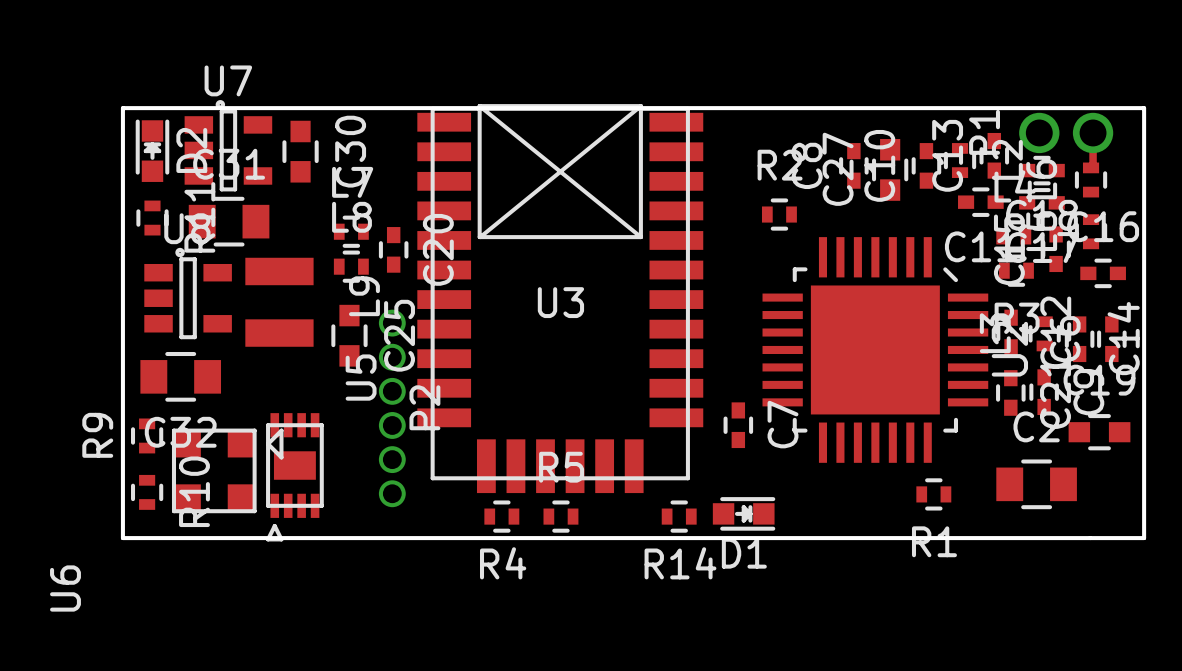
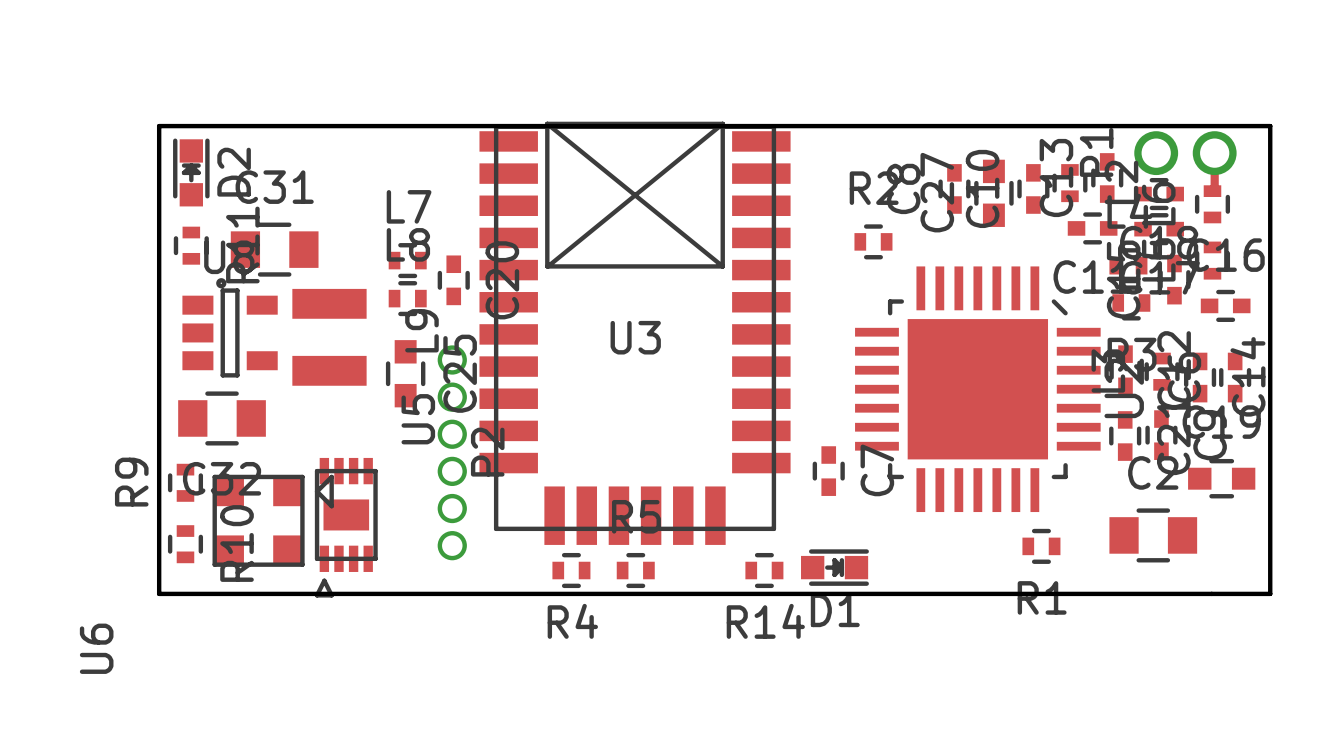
U7: (228, 145) -> none
C30: (300, 151) -> none

